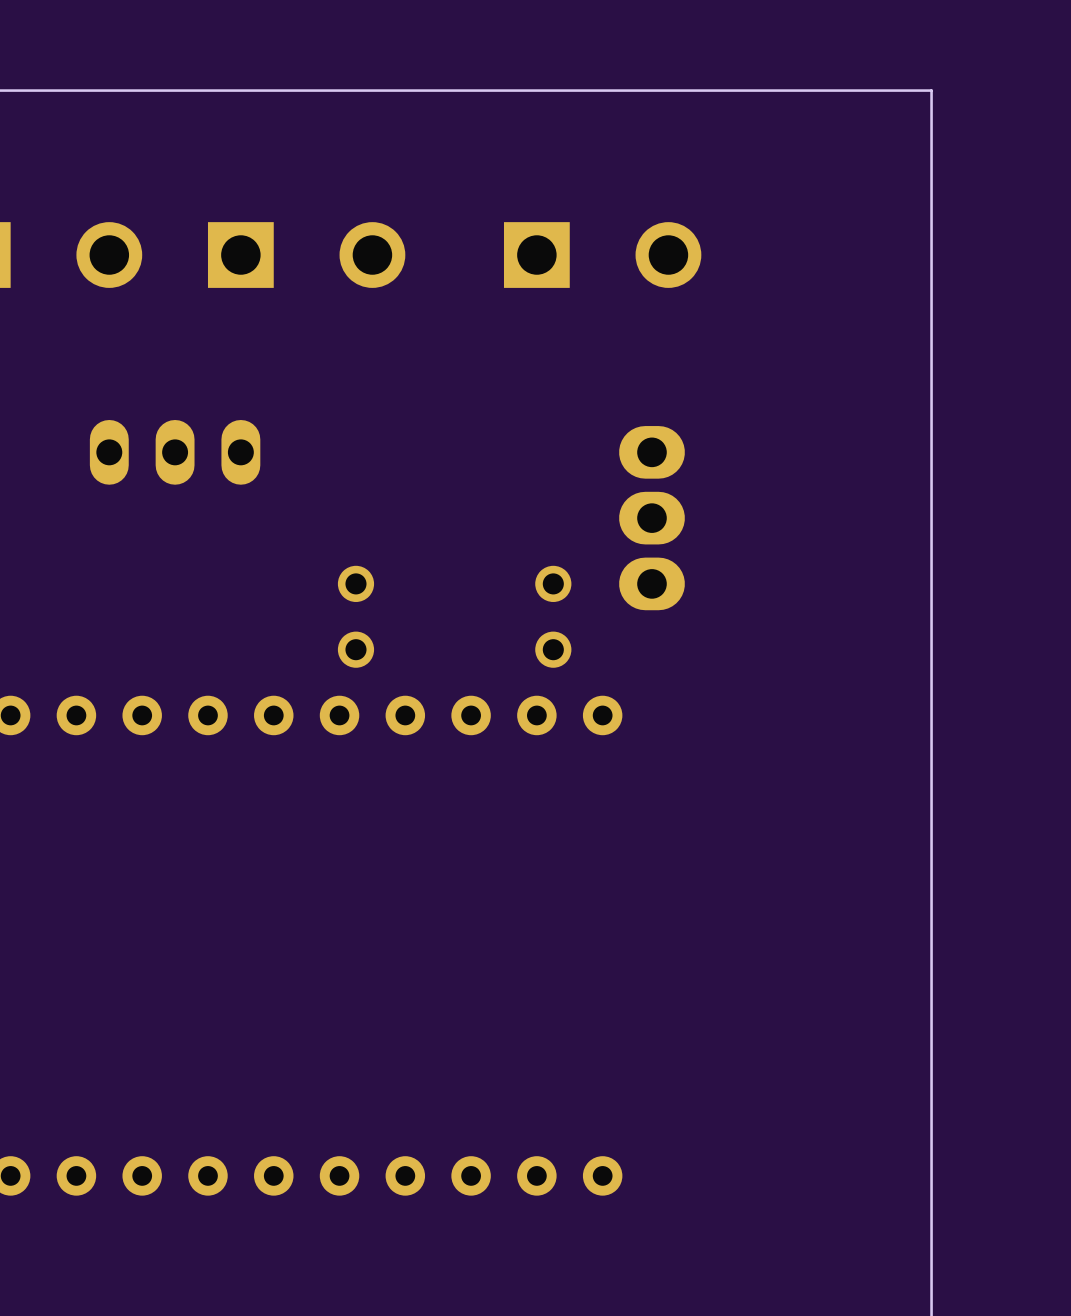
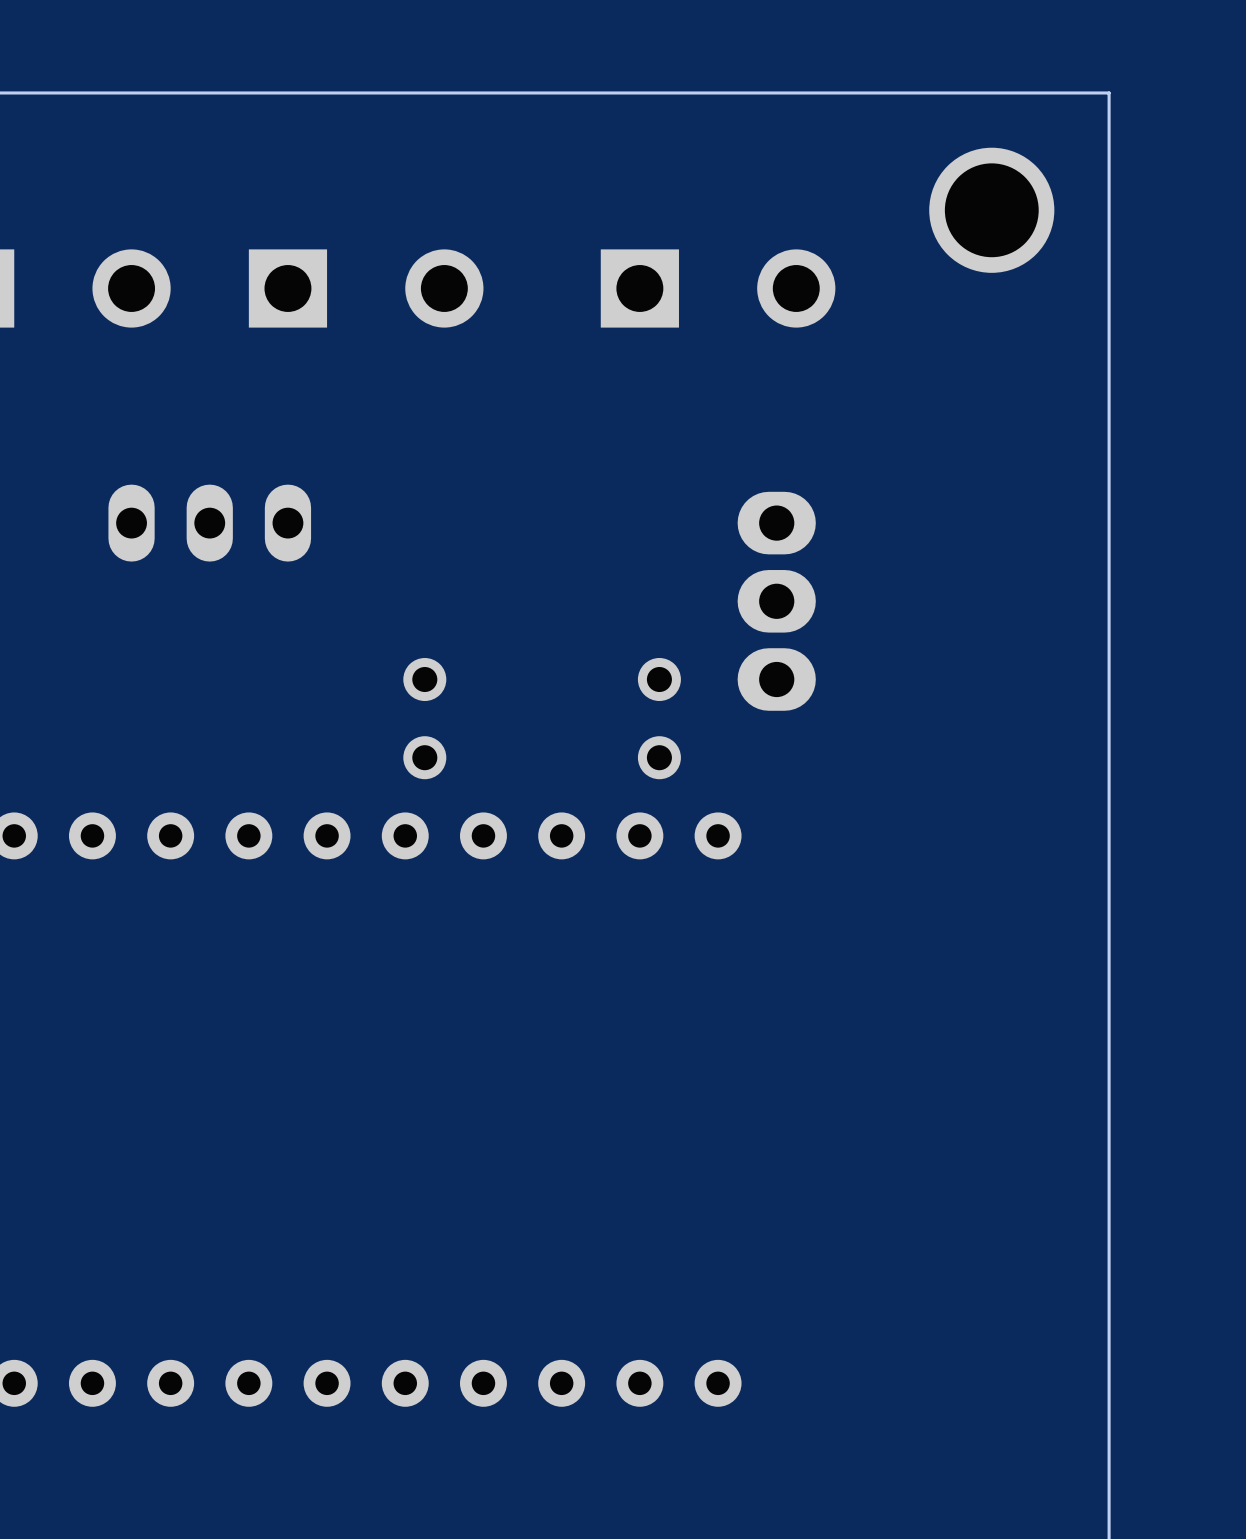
part: none -> (991, 210)

